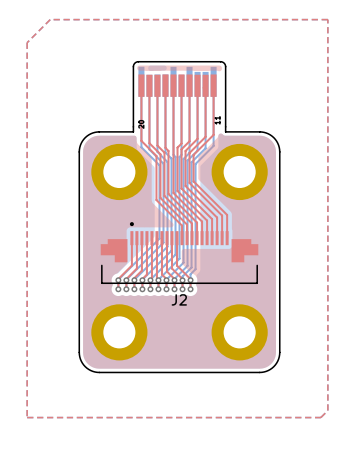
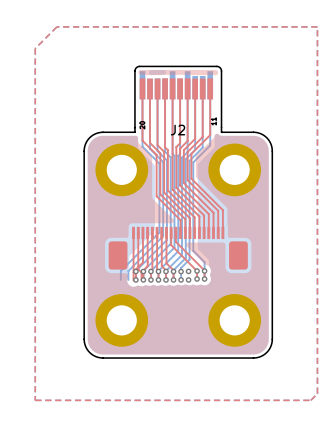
J2 footprint: [100, 222, 259, 284] -> [108, 226, 248, 270]
top track: (177, 248) (177, 265) (190, 279) (190, 289) -> (175, 241) (204, 270) (204, 279)
top track: (172, 252) (172, 268) (182, 279) (182, 289) -> (171, 245) (197, 271) (197, 279)
bottom track: (195, 258) (195, 269) (190, 274) (190, 289) -> (193, 250) (204, 262) (204, 279)
top track: (131, 265) (118, 279) (118, 289) -> (133, 257) (133, 280)
top track: (136, 268) (126, 279) (126, 289) -> (138, 260) (141, 279)
via: none -> (197, 271)
via: none -> (204, 271)
via: (118, 280) -> none
via: (126, 280) -> none
via: none -> (197, 279)
via: none -> (204, 279)
via: (118, 289) -> none
via: (126, 289) -> none
J2 name position: J2 (179, 299) -> J2 (178, 130)

